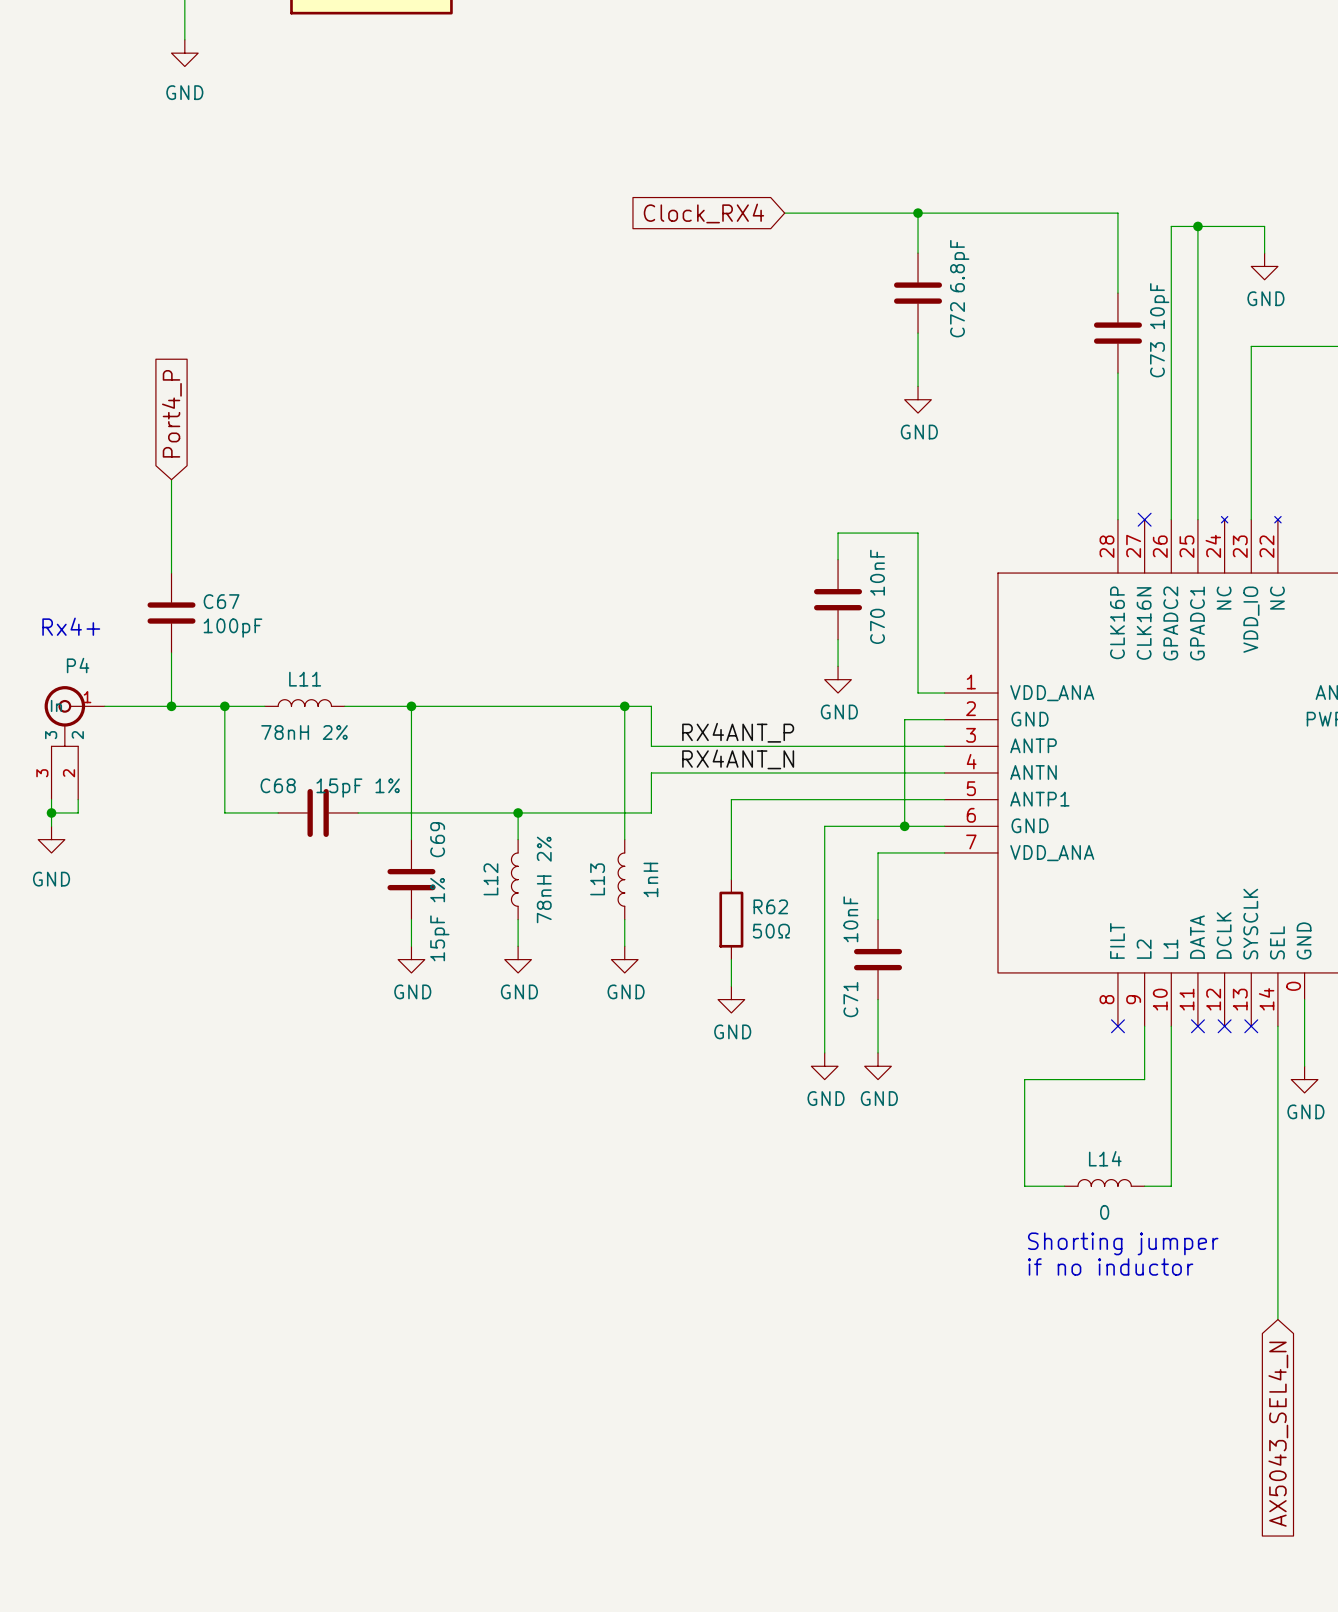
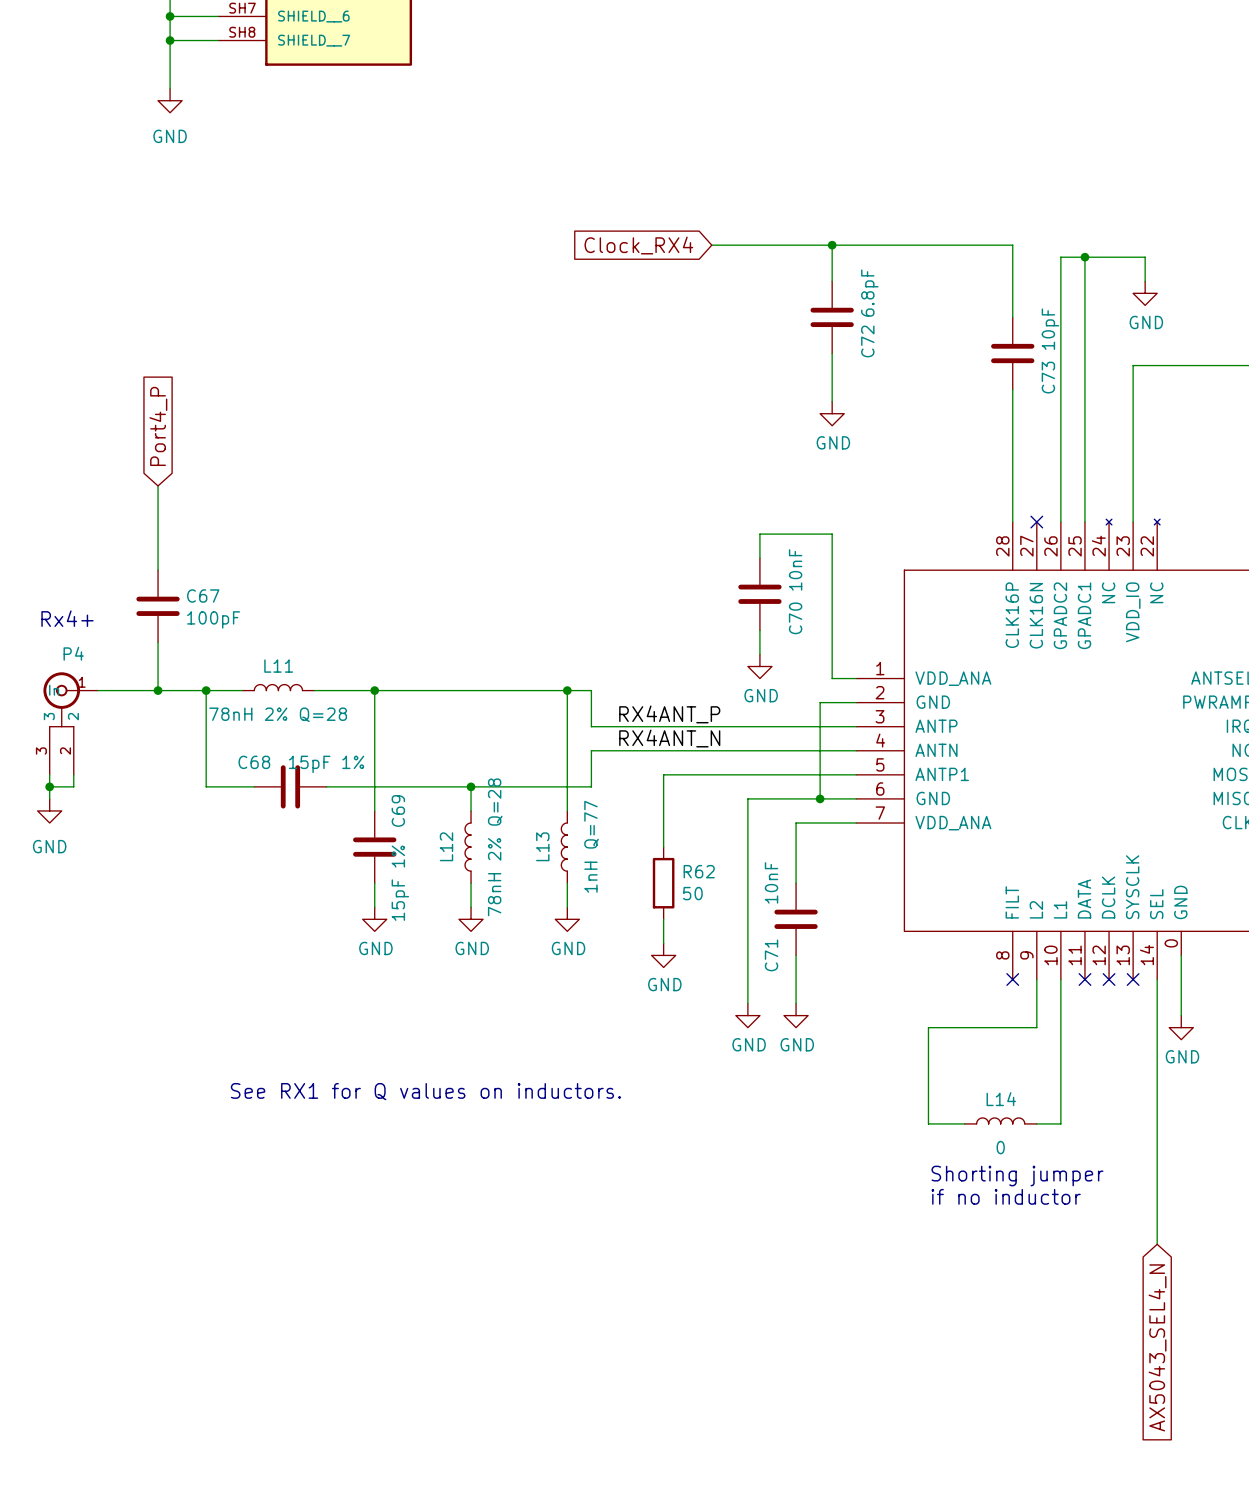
L11 value: 78nH 2% (304, 732) -> 78nH 2% Q=28 (278, 714)
L12 value: 78nH 2% (544, 879) -> 78nH 2% Q=28 (495, 847)
L13 value: 1nH (650, 879) -> 1nH Q=77 (591, 846)
R62 value: 50Ω (771, 931) -> 50 (692, 893)
text: none -> See RX1 for Q values on inductors. (425, 1091)

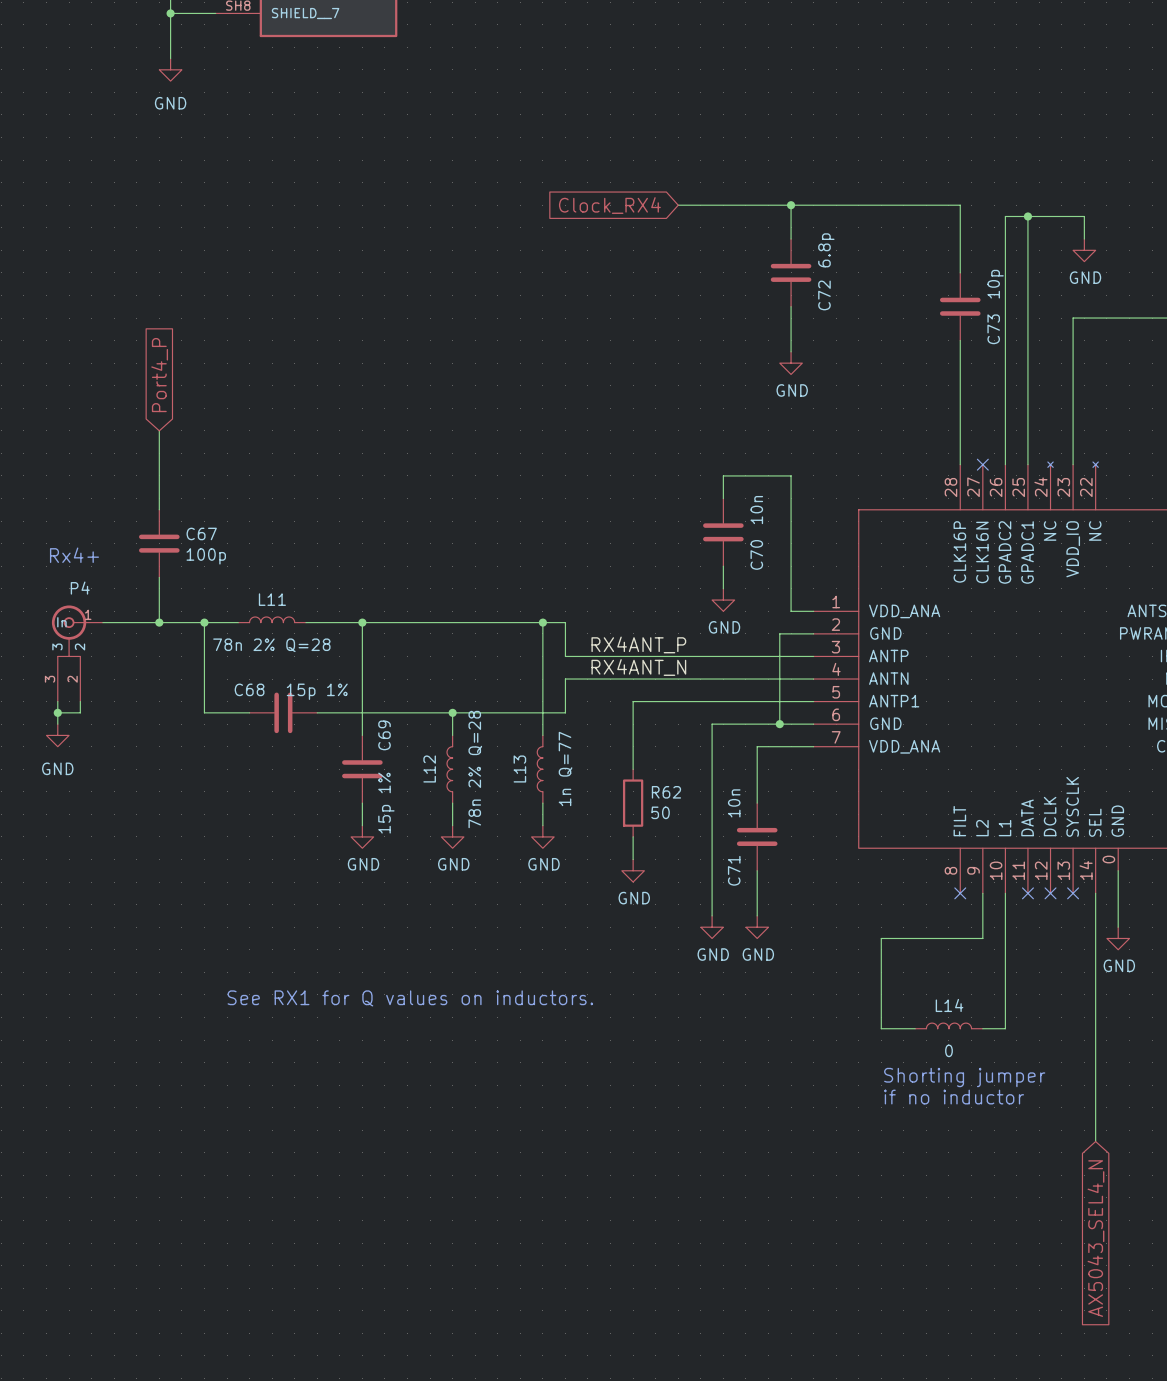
C72 value: 6.8pF (869, 293) -> 6.8p (826, 250)
C73 value: 10pF (1050, 329) -> 10p (995, 284)
C70 value: 10nF (795, 569) -> 10n (756, 510)
C67 value: 100pF (213, 619) -> 100p (206, 556)
L11 value: 78nH 2% Q=28 (278, 714) -> 78n 2% Q=28 (271, 645)
C68 value: 15pF 1% (326, 764) -> 15p 1% (317, 691)
L13 value: 1nH Q=77 (591, 846) -> 1n Q=77 (565, 768)
L12 value: 78nH 2% Q=28 (495, 847) -> 78n 2% Q=28 (475, 769)
C71 value: 10nF (771, 882) -> 10n (734, 803)
C69 value: 15pF 1% (400, 883) -> 15p 1% (386, 803)

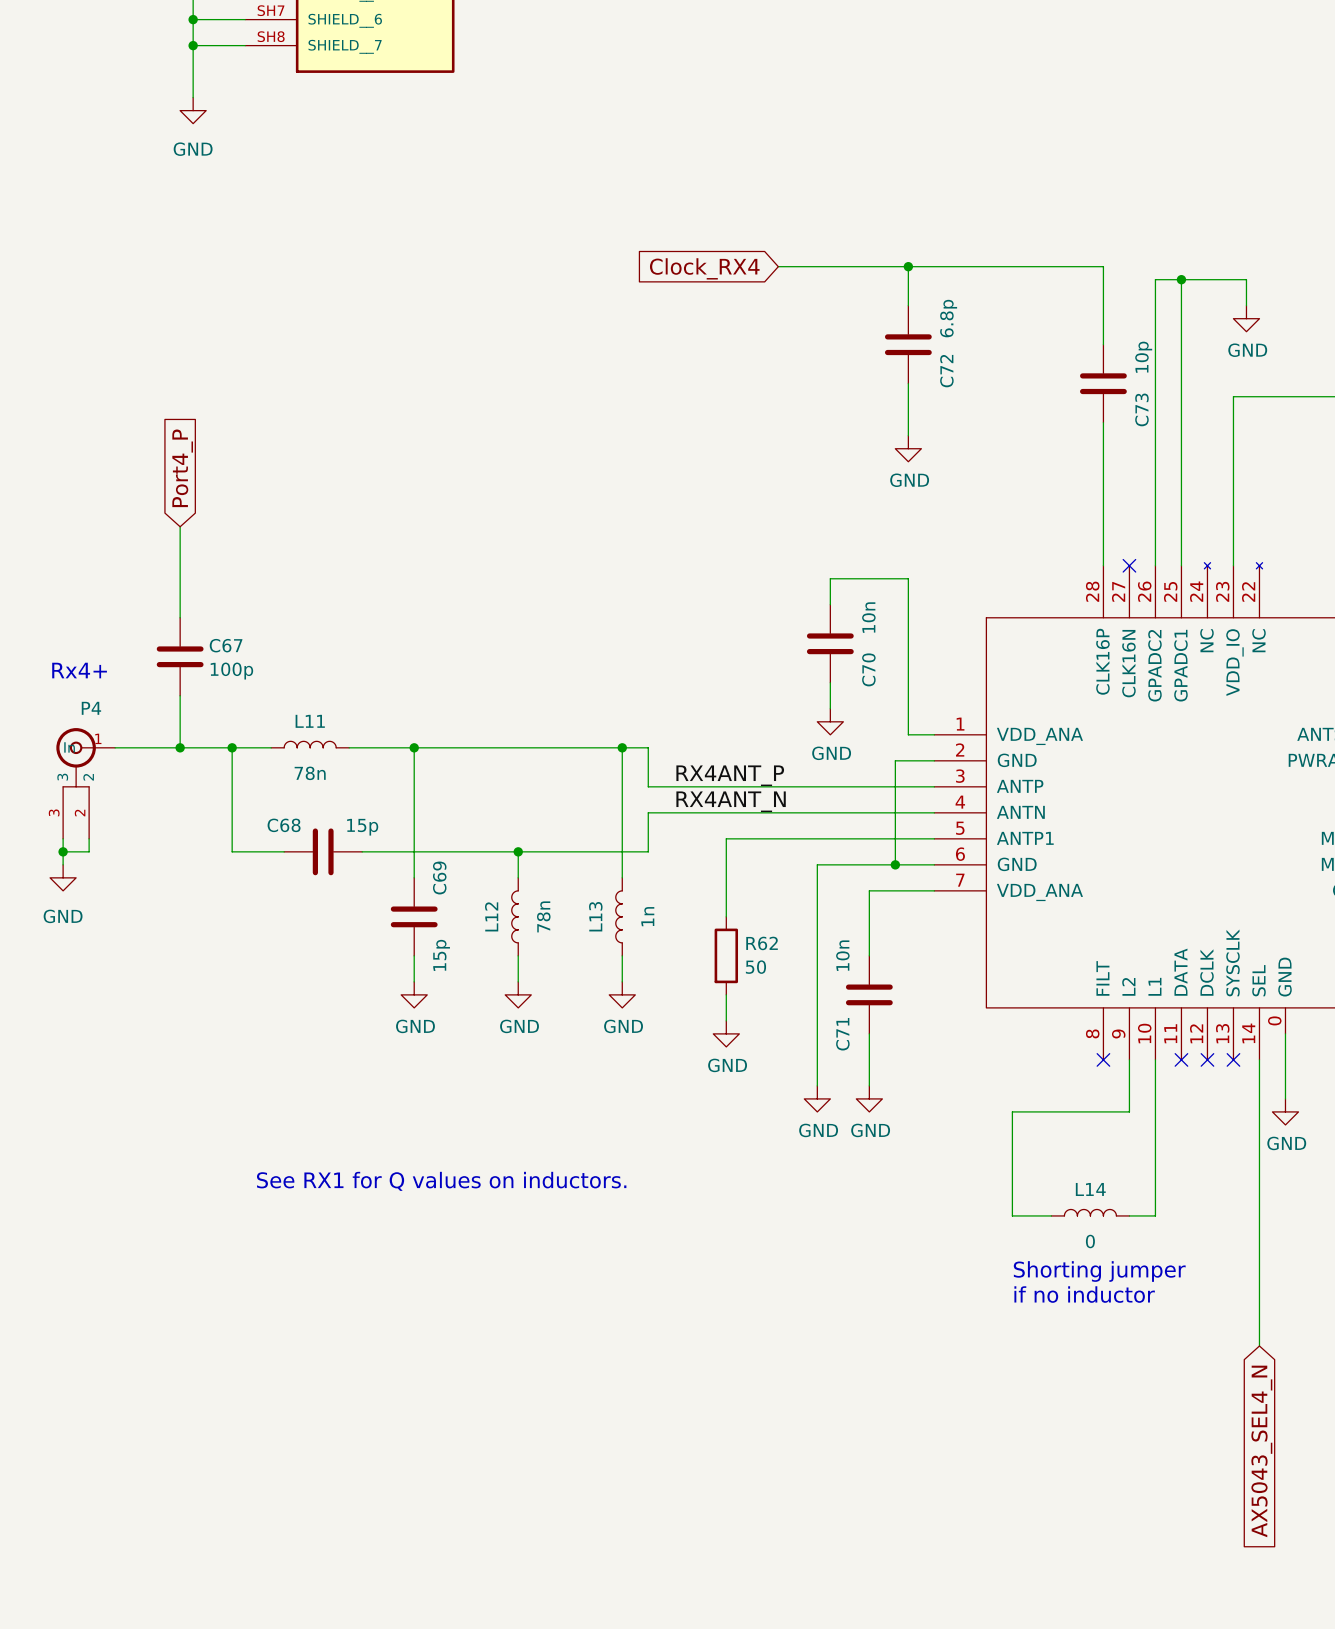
L11 value: 78n 2% Q=28 (271, 645) -> 78n (310, 773)
C68 value: 15p 1% (317, 691) -> 15p (362, 827)
L13 value: 1n Q=77 (565, 768) -> 1n (647, 916)
L12 value: 78n 2% Q=28 (475, 769) -> 78n (543, 916)
C69 value: 15p 1% (386, 803) -> 15p (441, 955)

